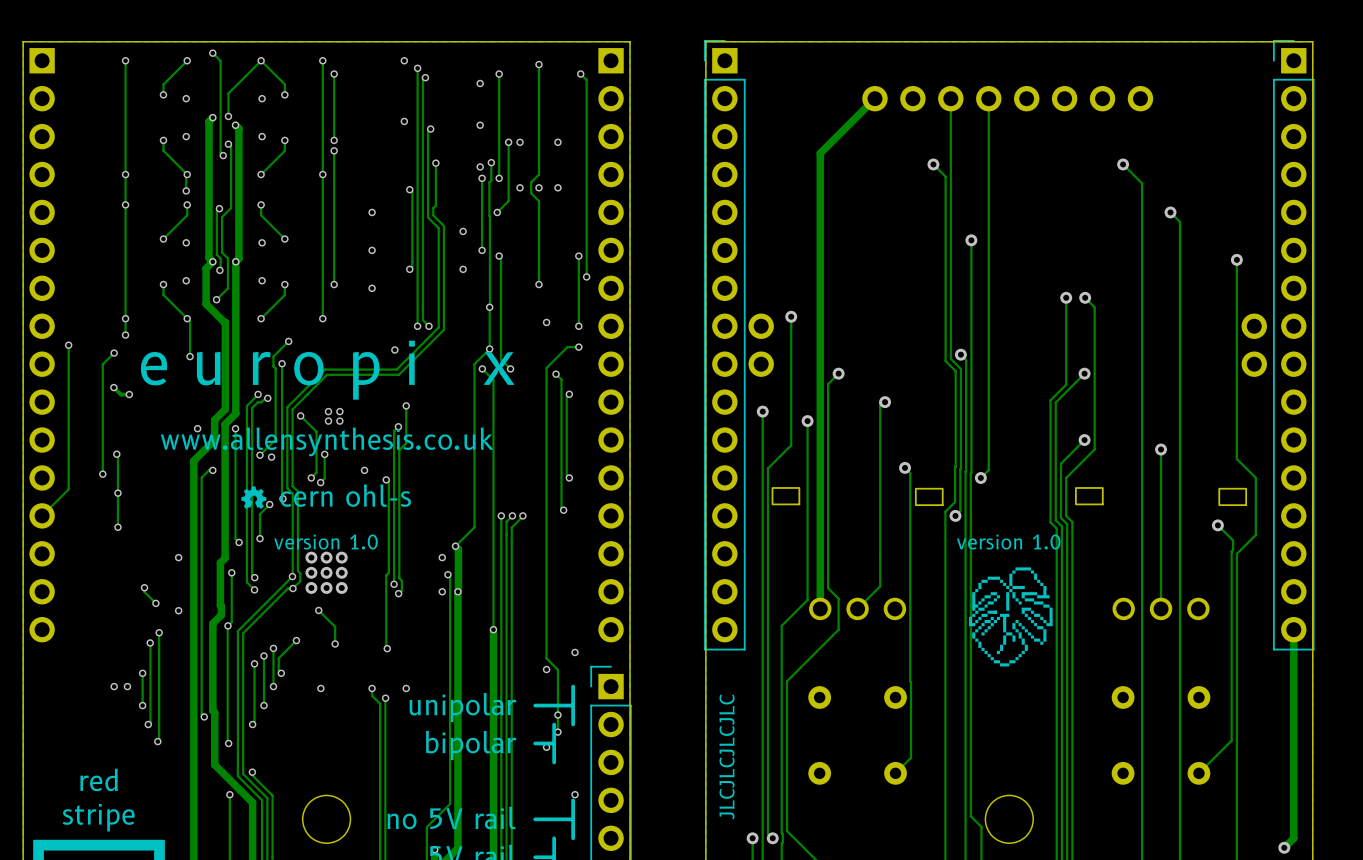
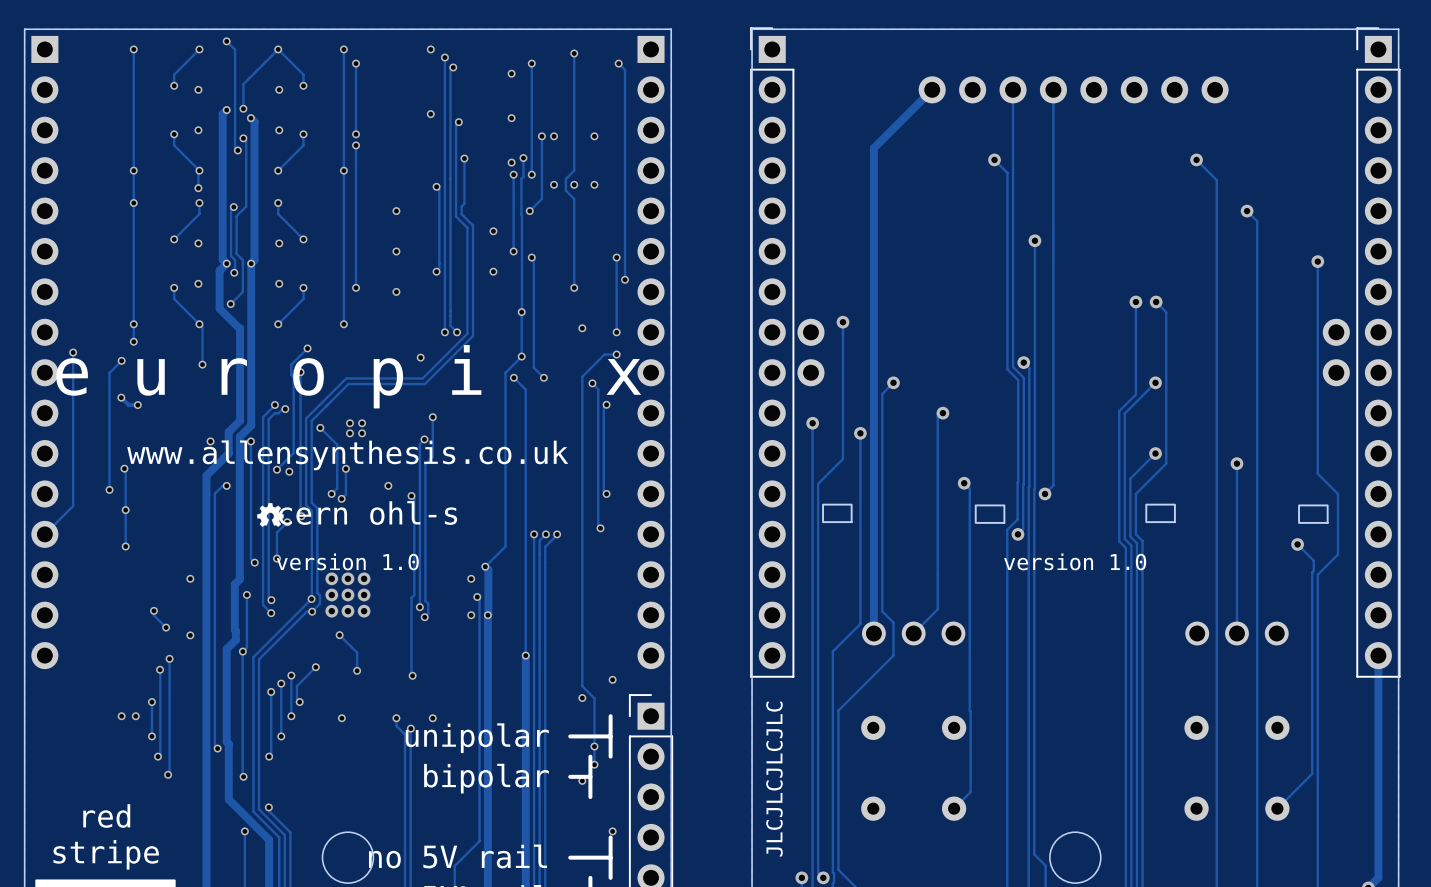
drawing: [969, 567, 1053, 667] -> none

